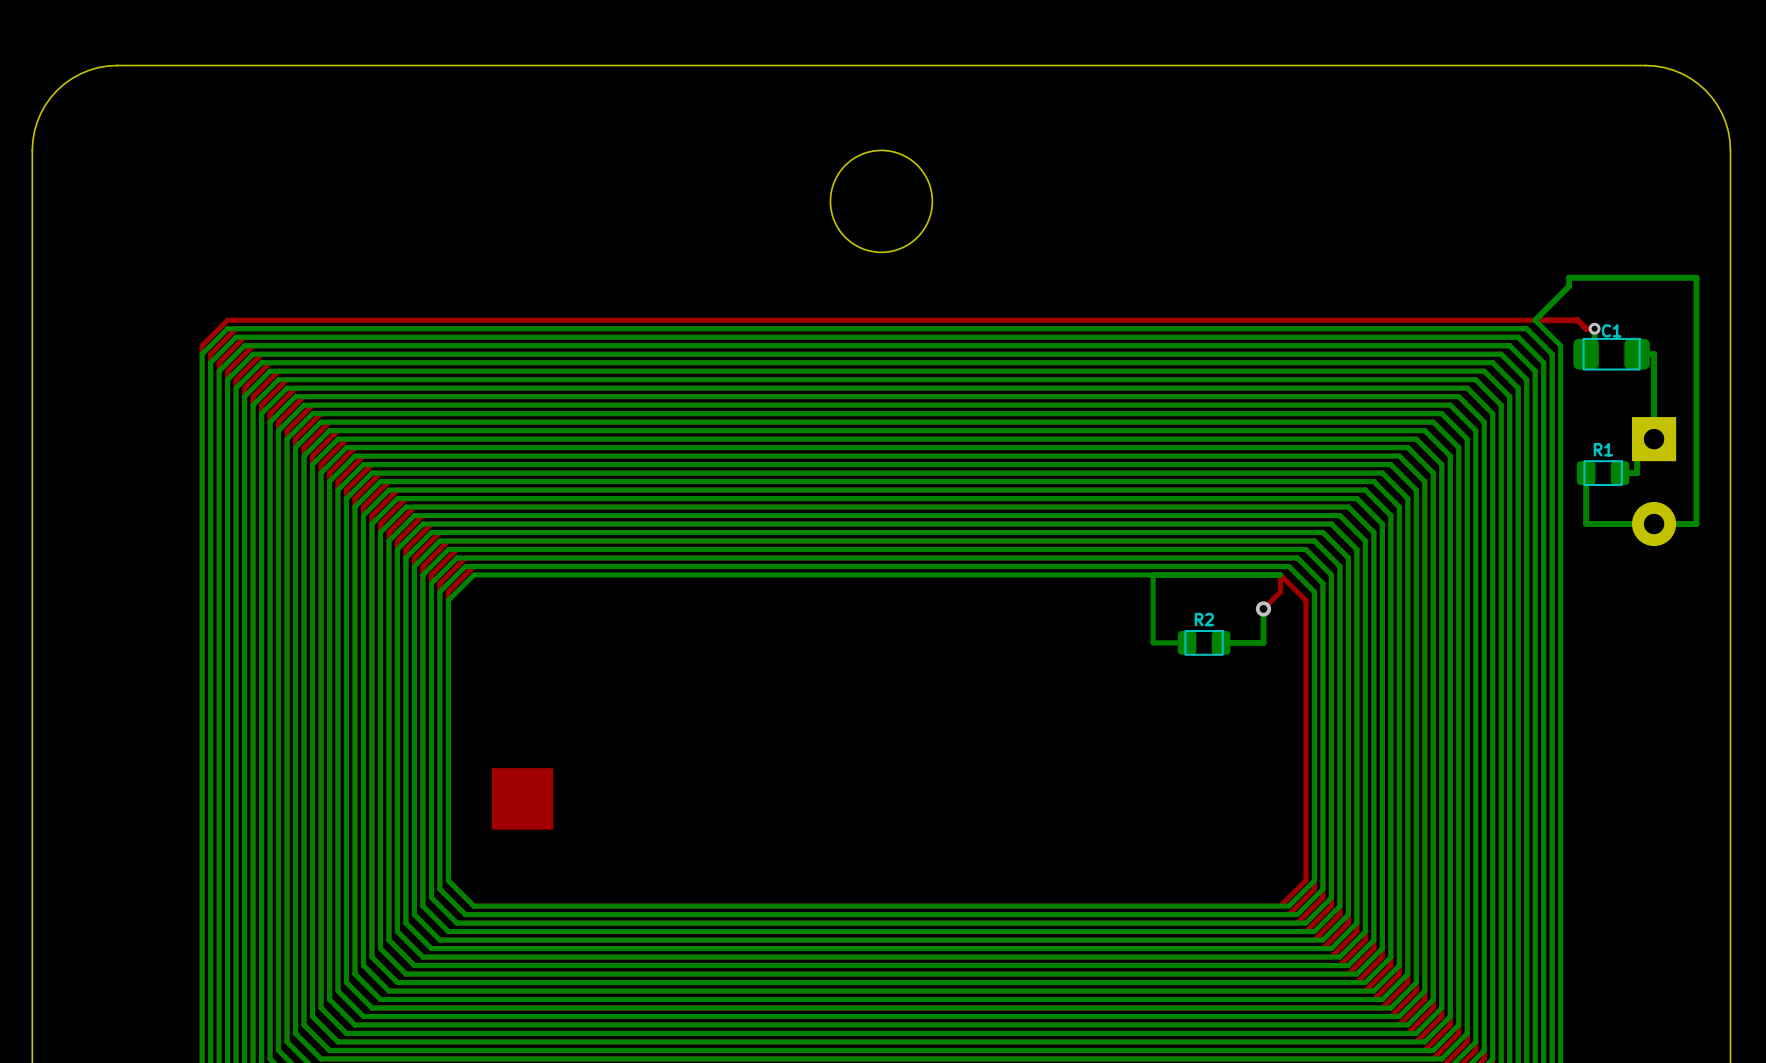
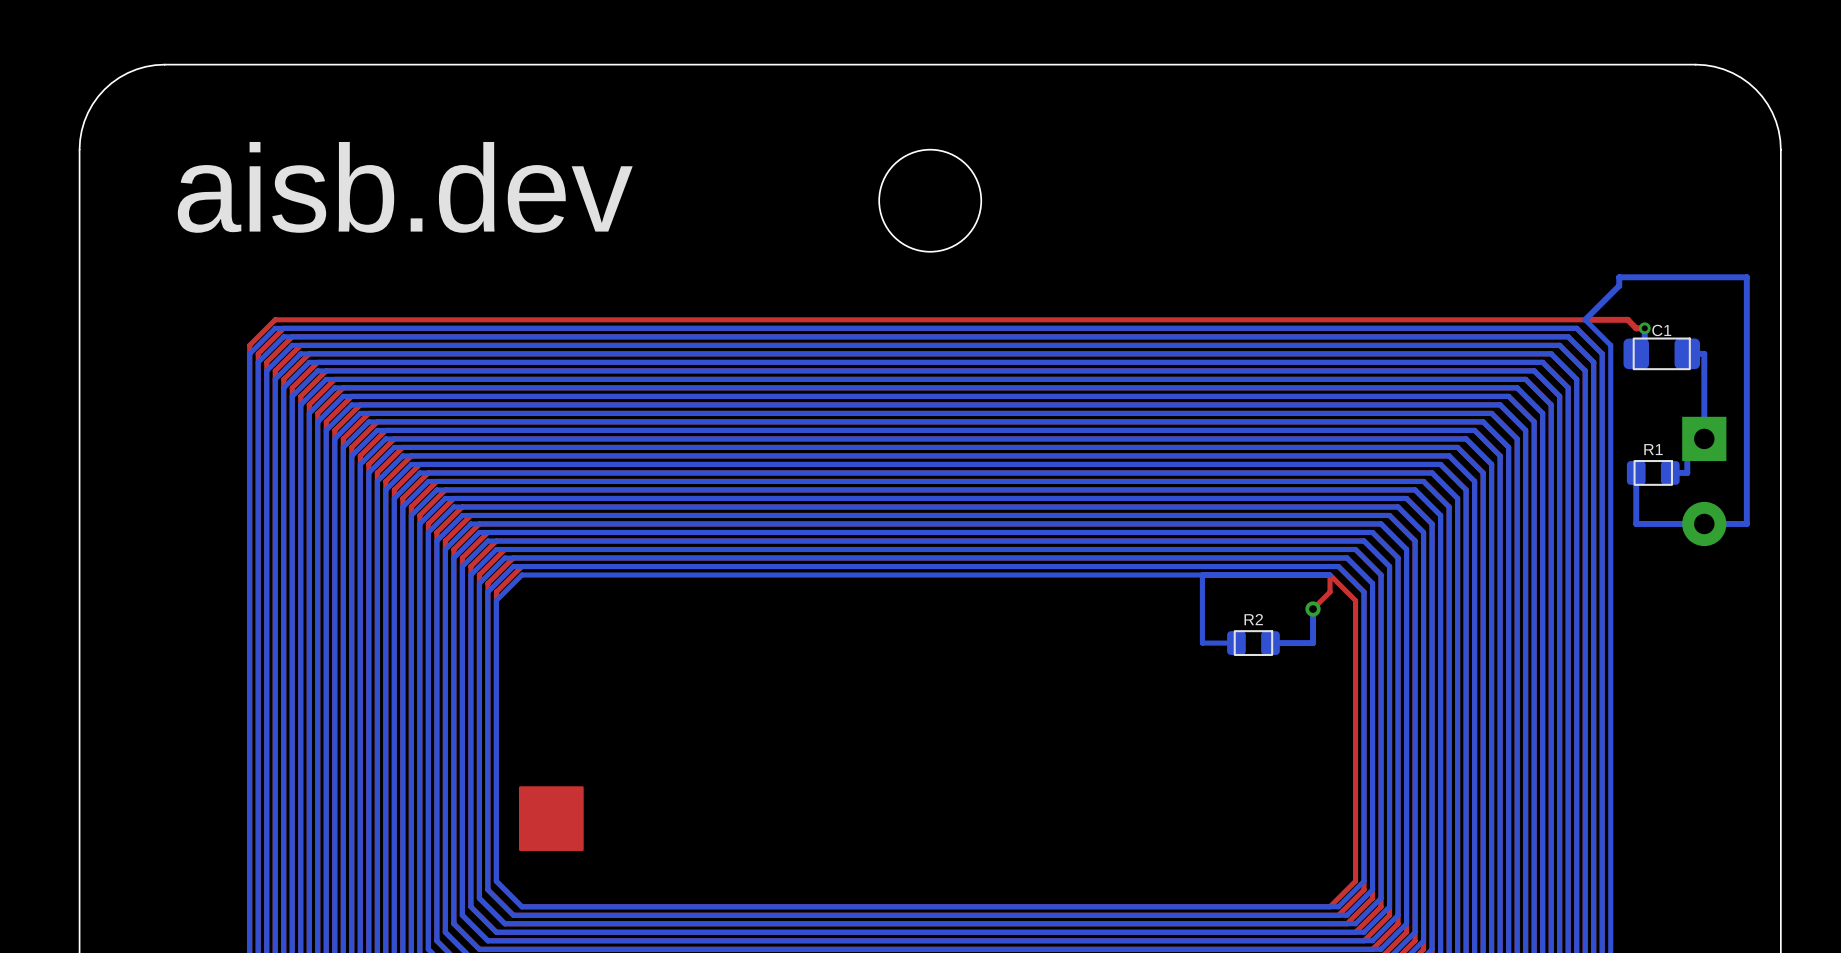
text: none -> aisb.dev (405, 187)
part: (522, 798) -> none
part: none -> (551, 818)

